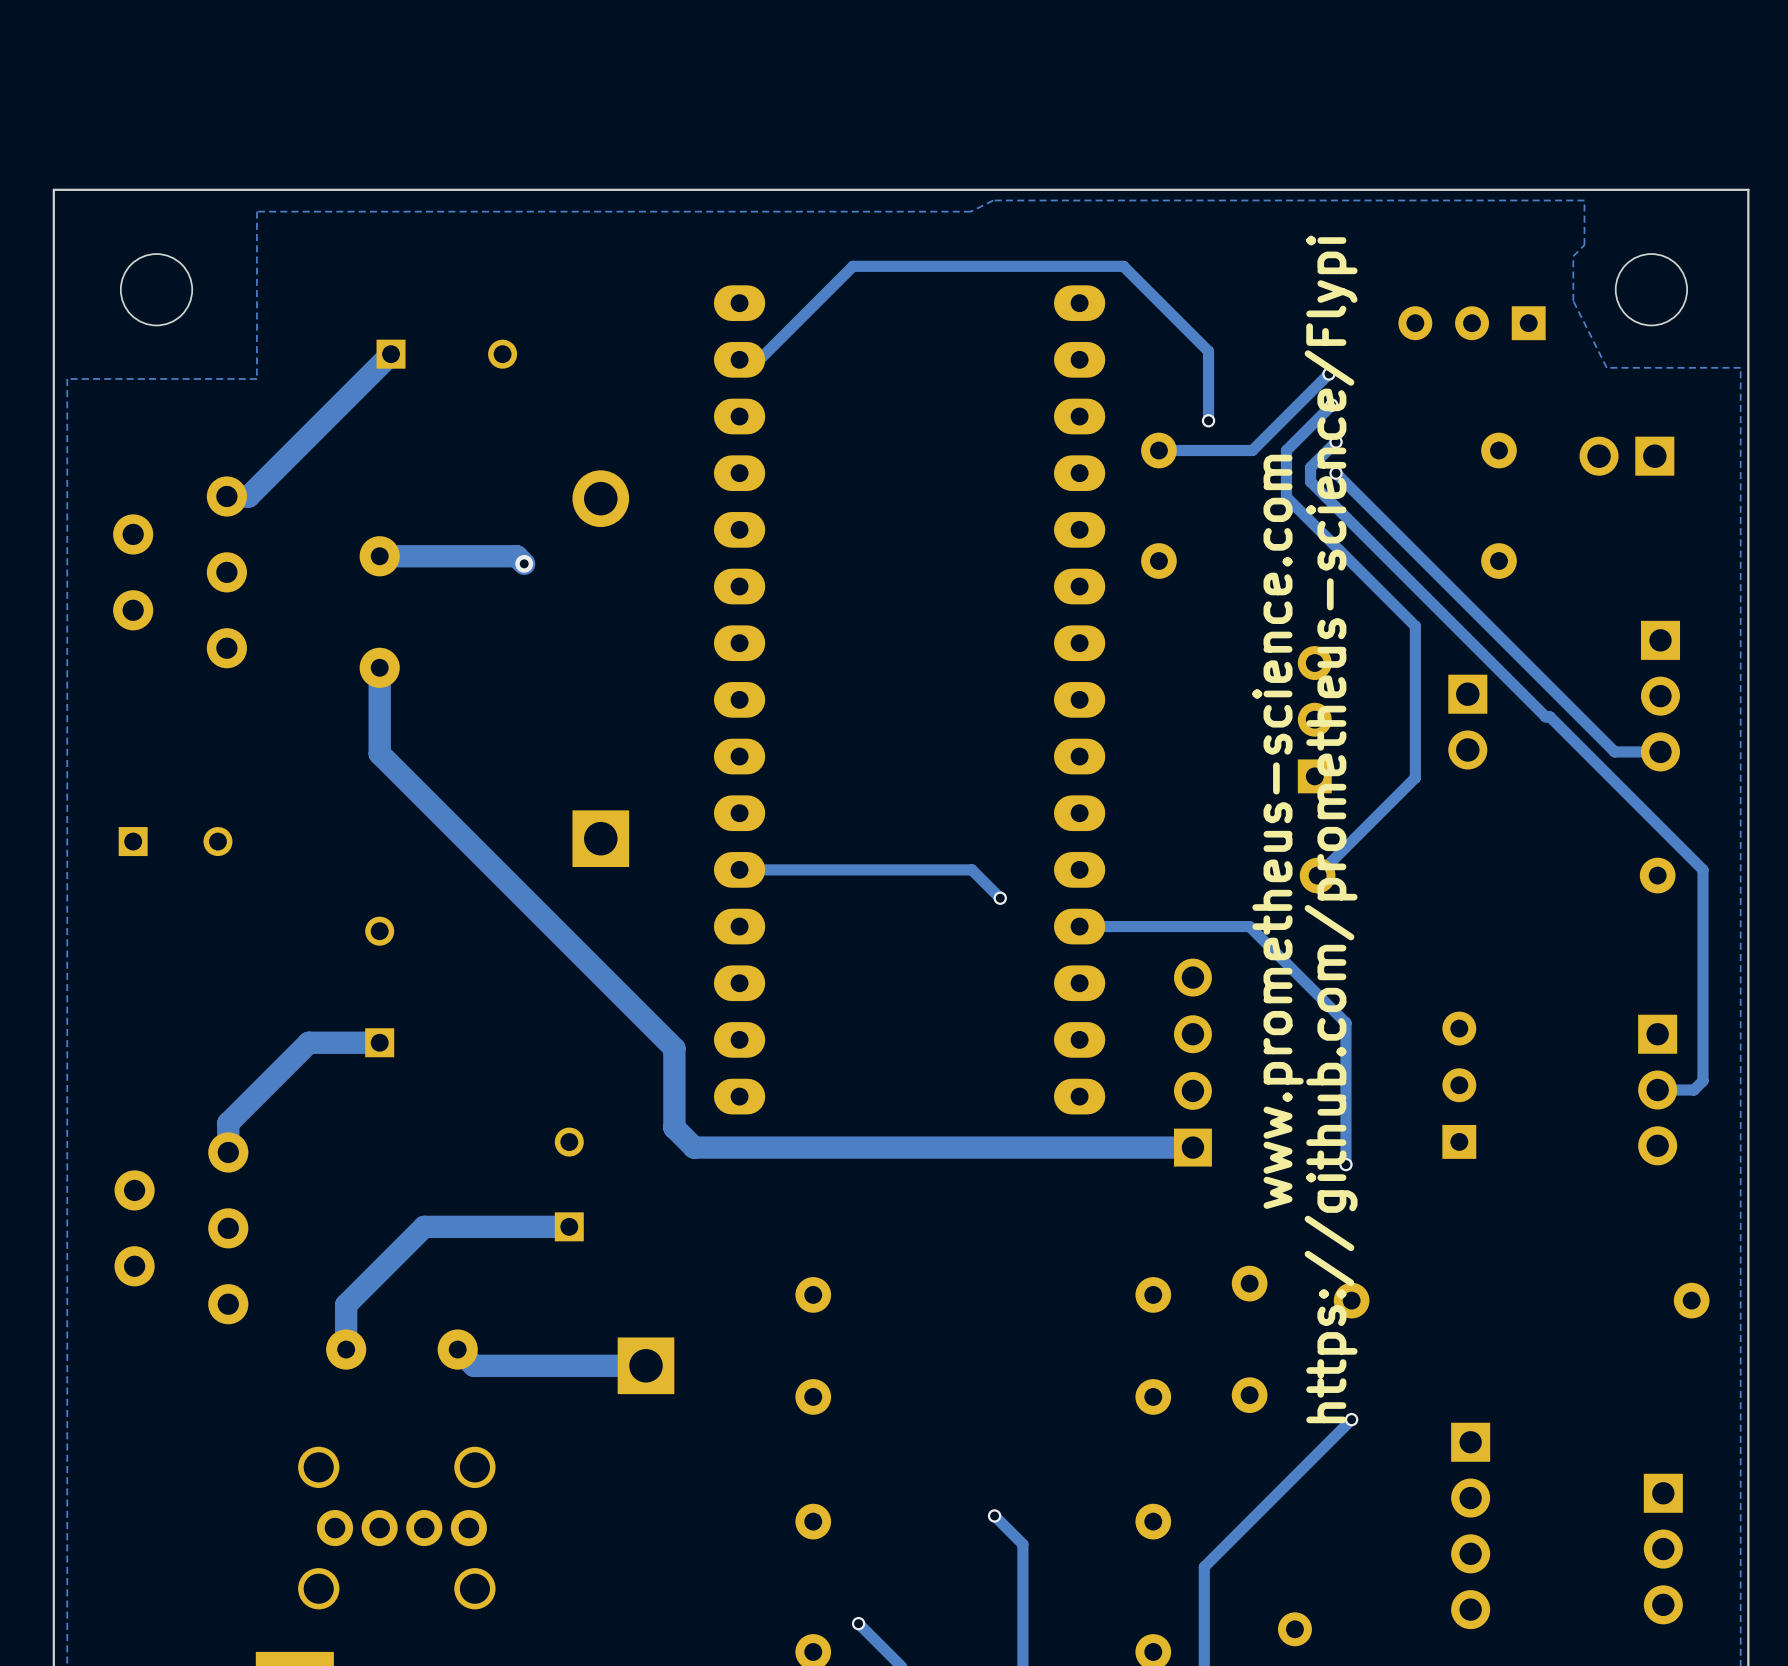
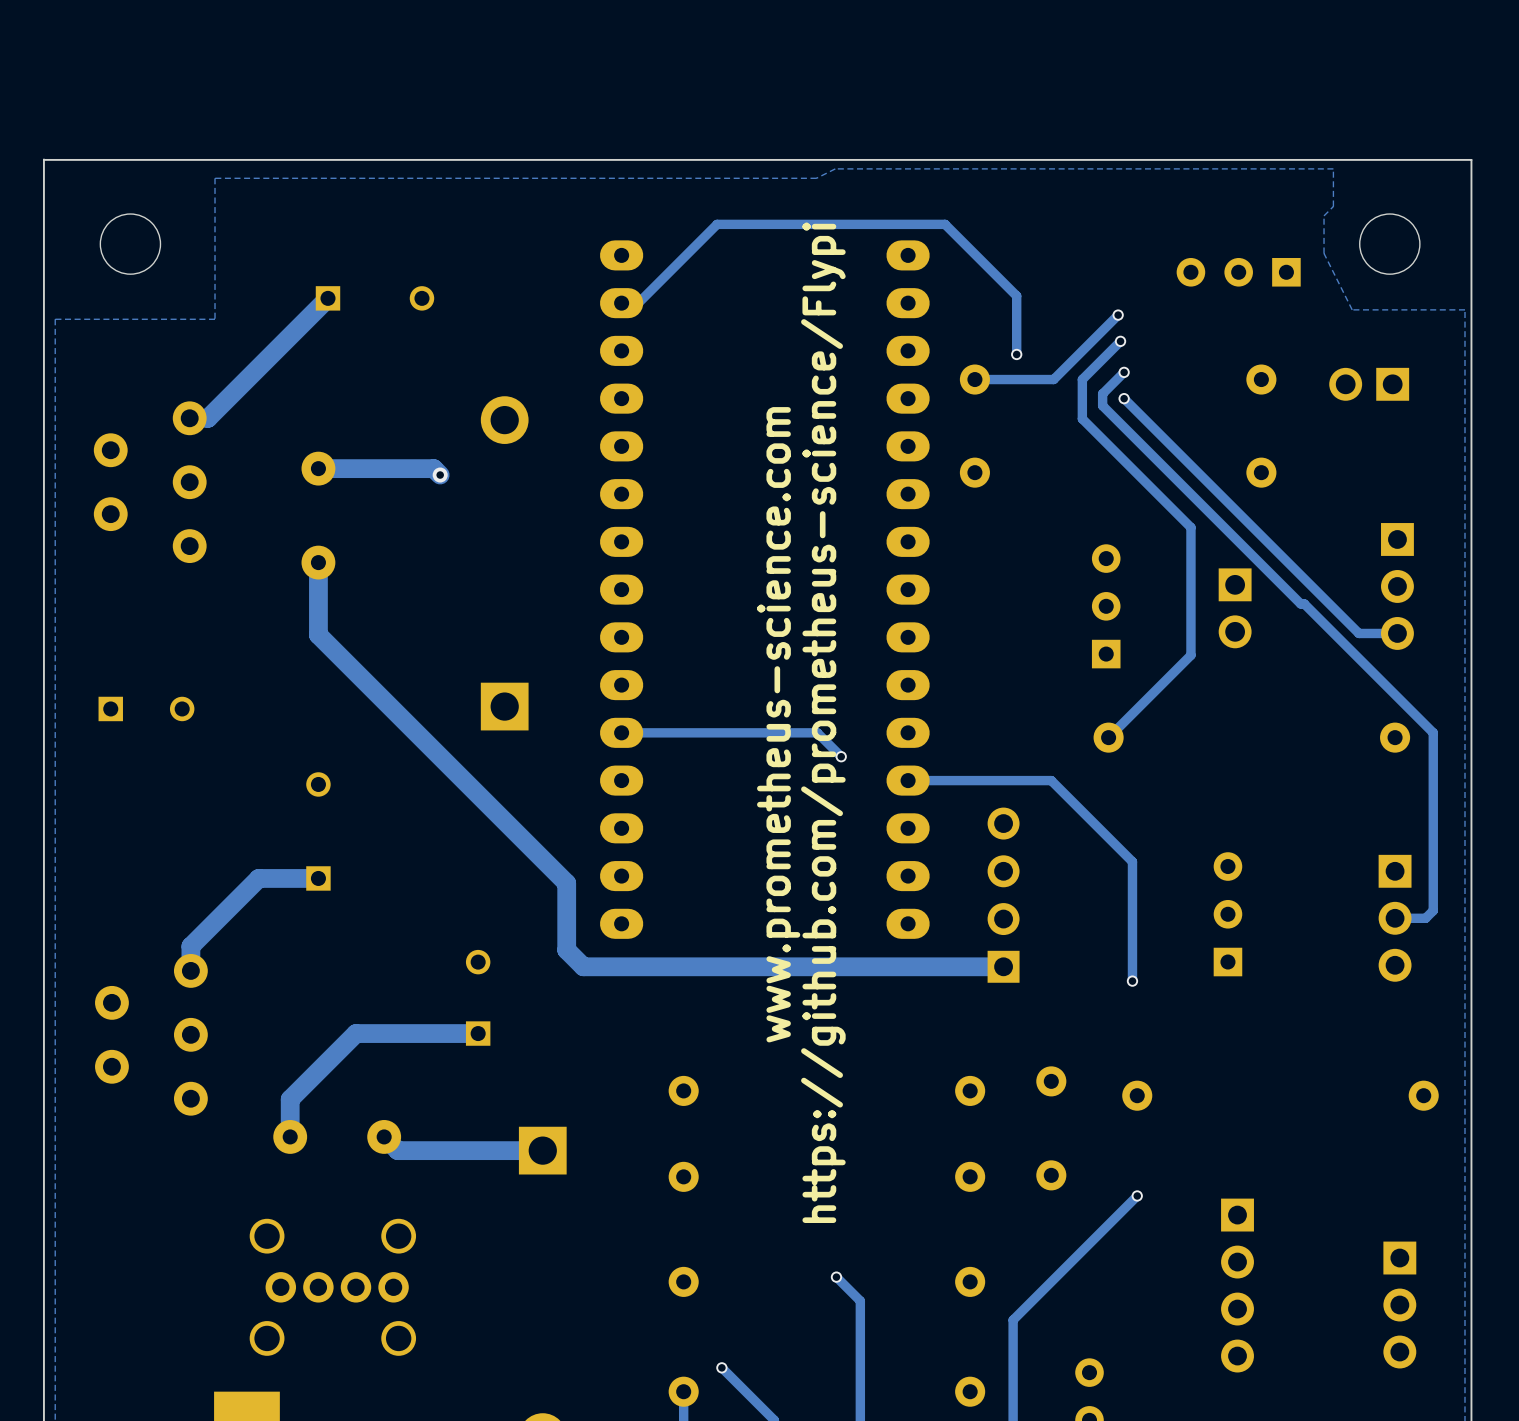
text position: https://github.com/prometheus-science/Flypi (1331, 829) -> https://github.com/prometheus-science/Flypi (823, 722)
text position: www.prometheus-science.com (1278, 831) -> www.prometheus-science.com (778, 724)

